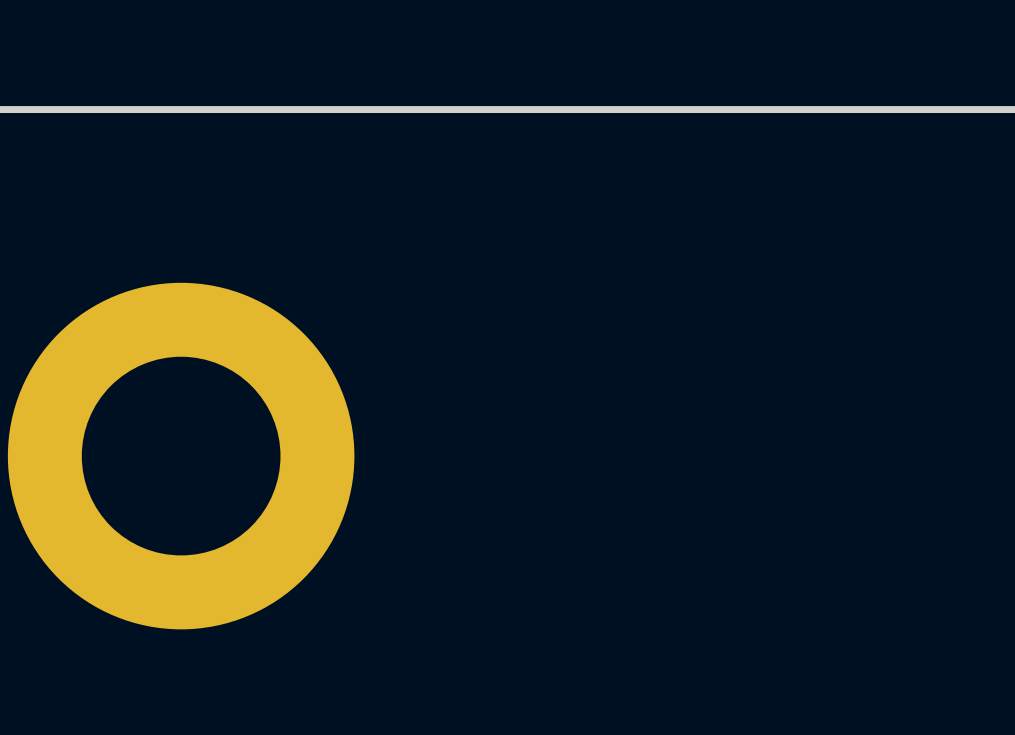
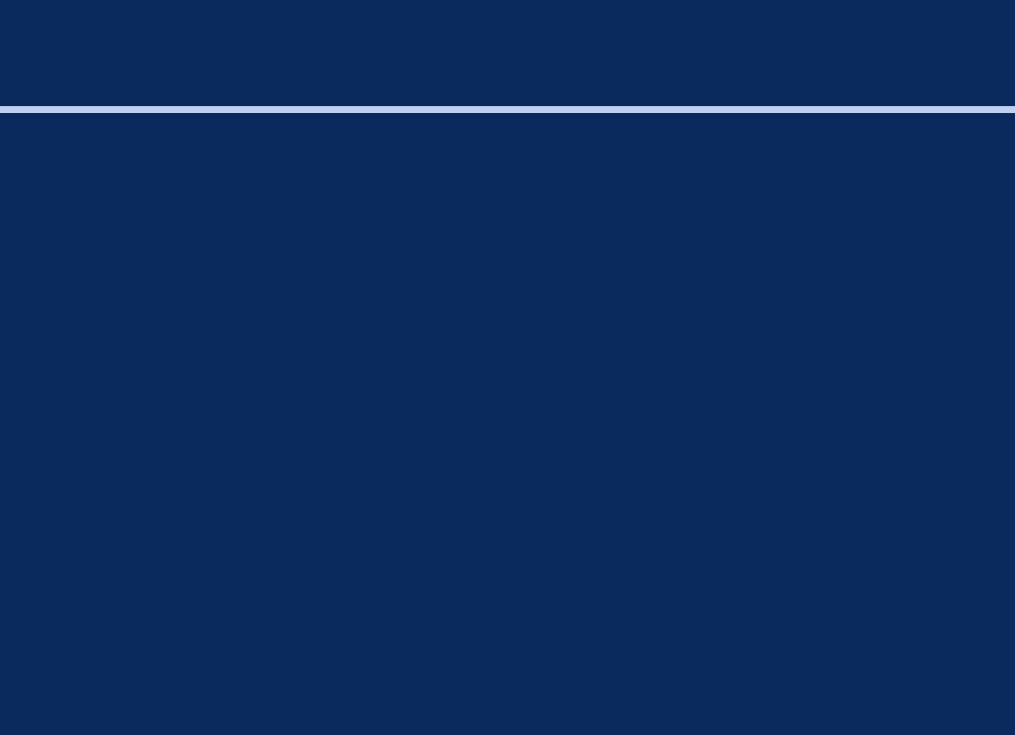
part: (181, 456) -> none

